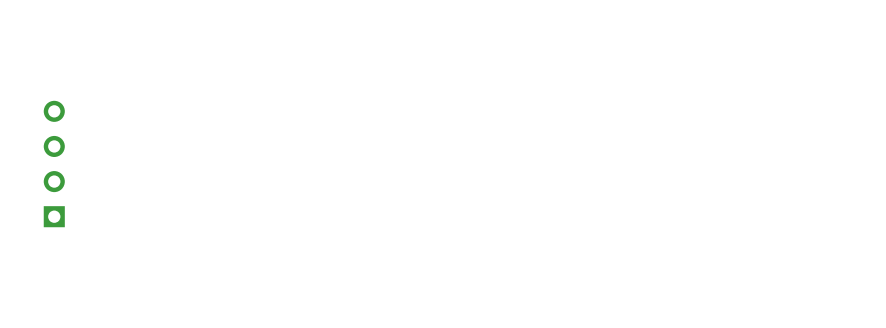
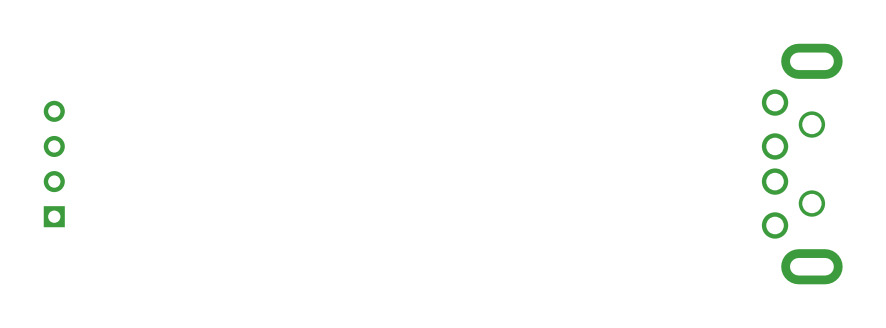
part: none -> (802, 164)

